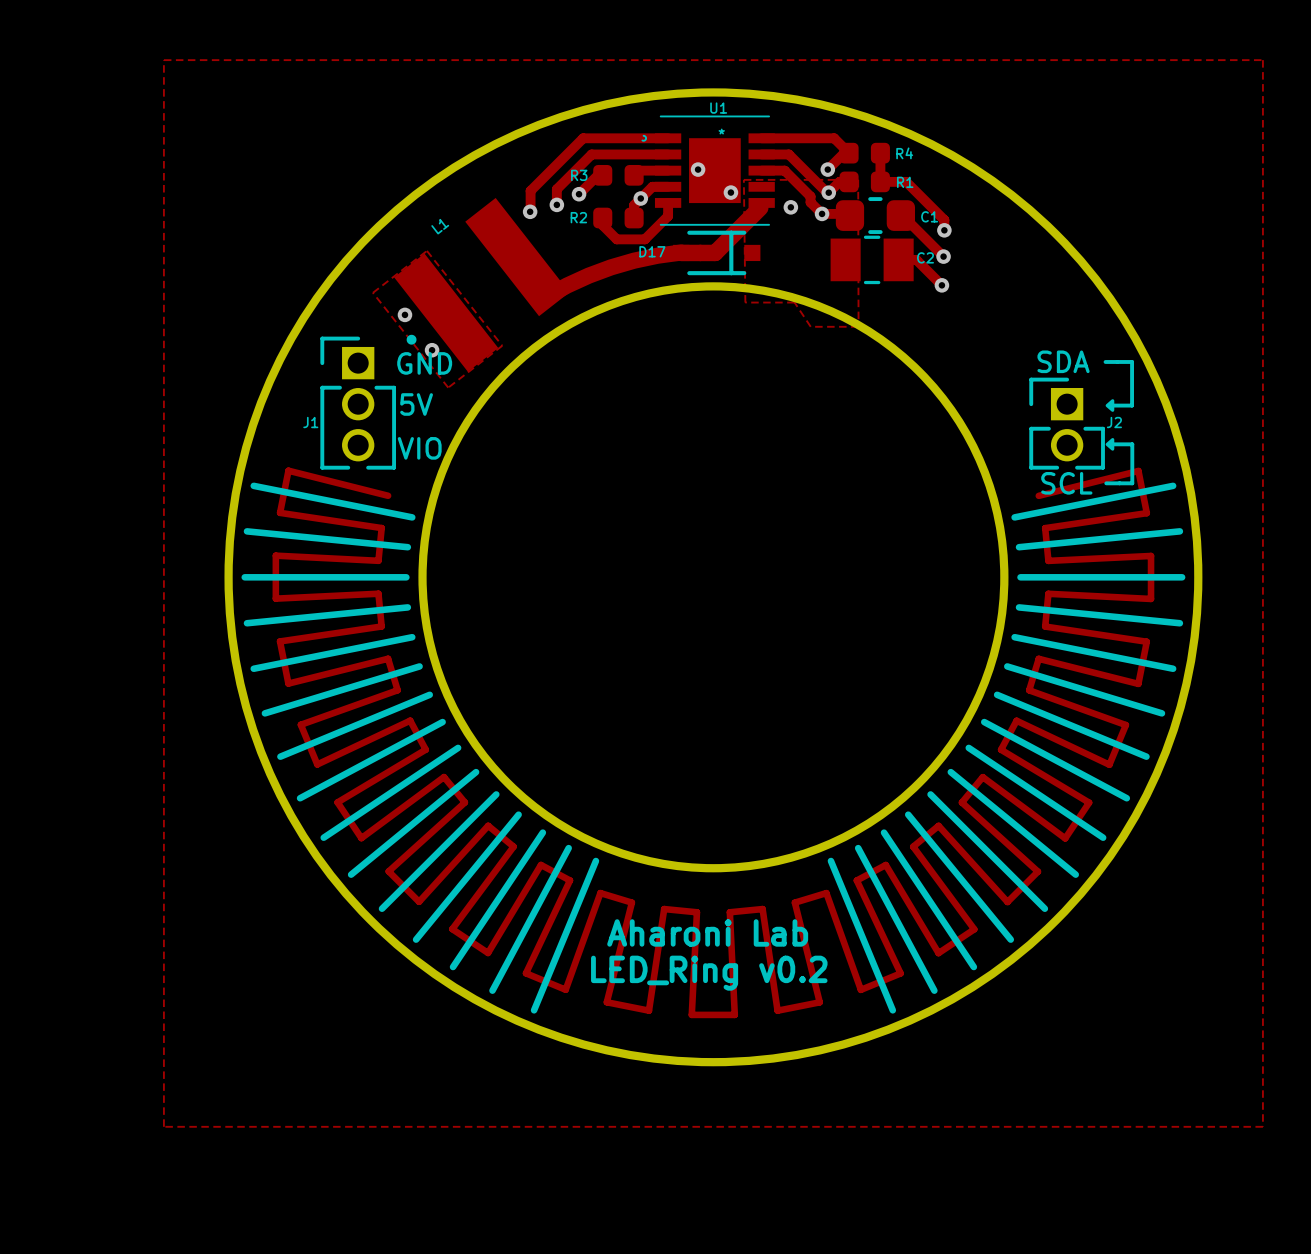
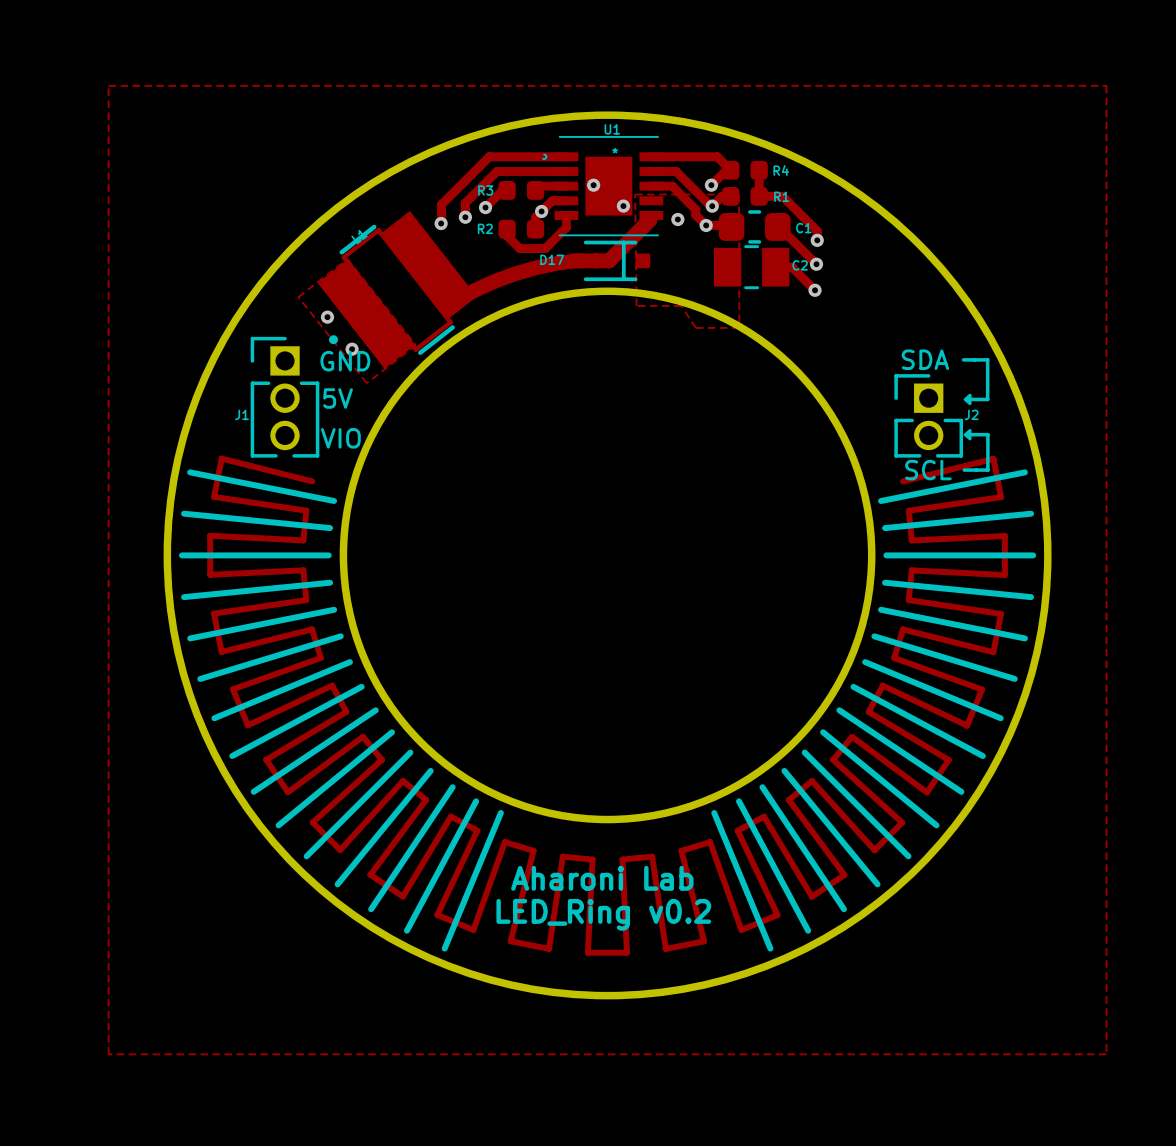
L1 footprint: [394, 197, 570, 372] -> [317, 210, 477, 369]

